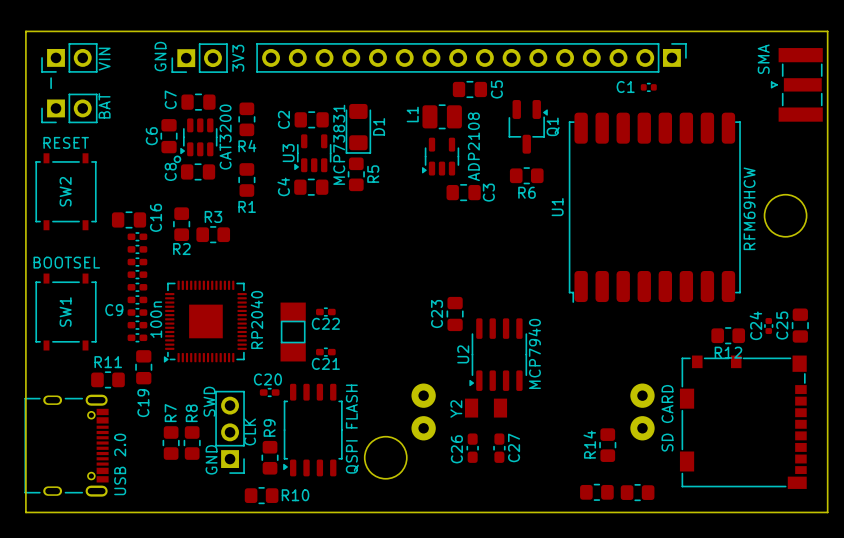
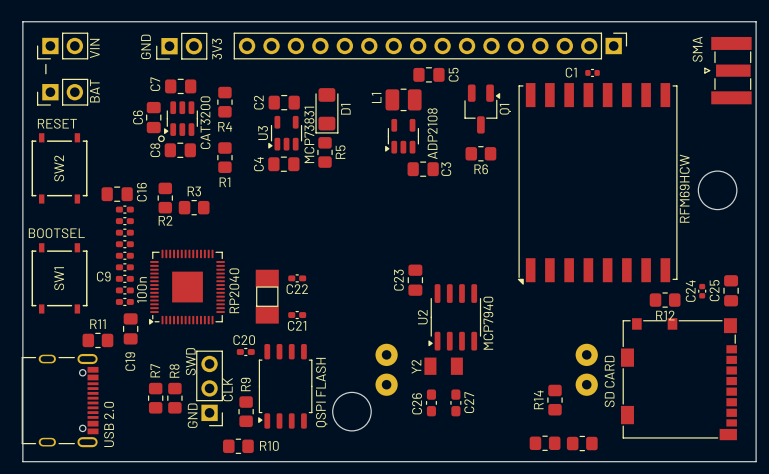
U1: (654, 207) -> none
part: none -> (597, 183)

